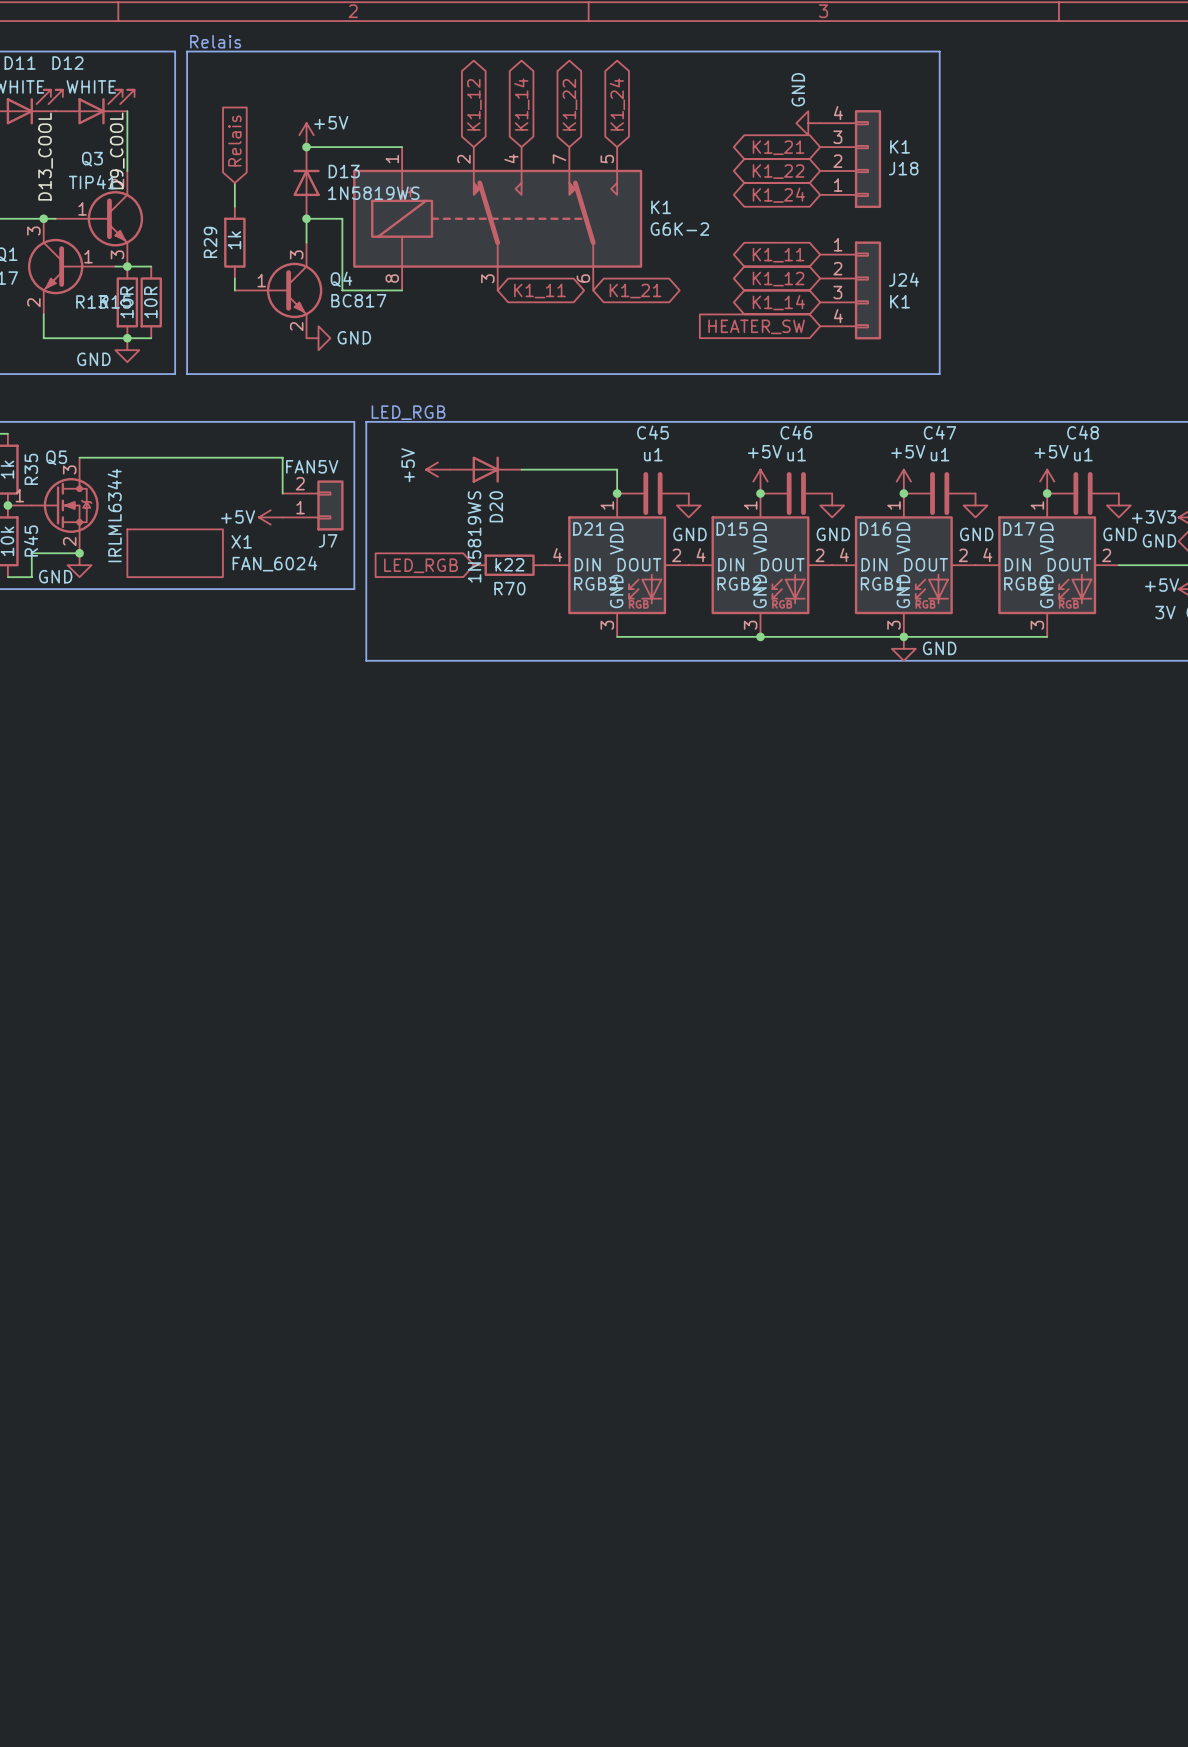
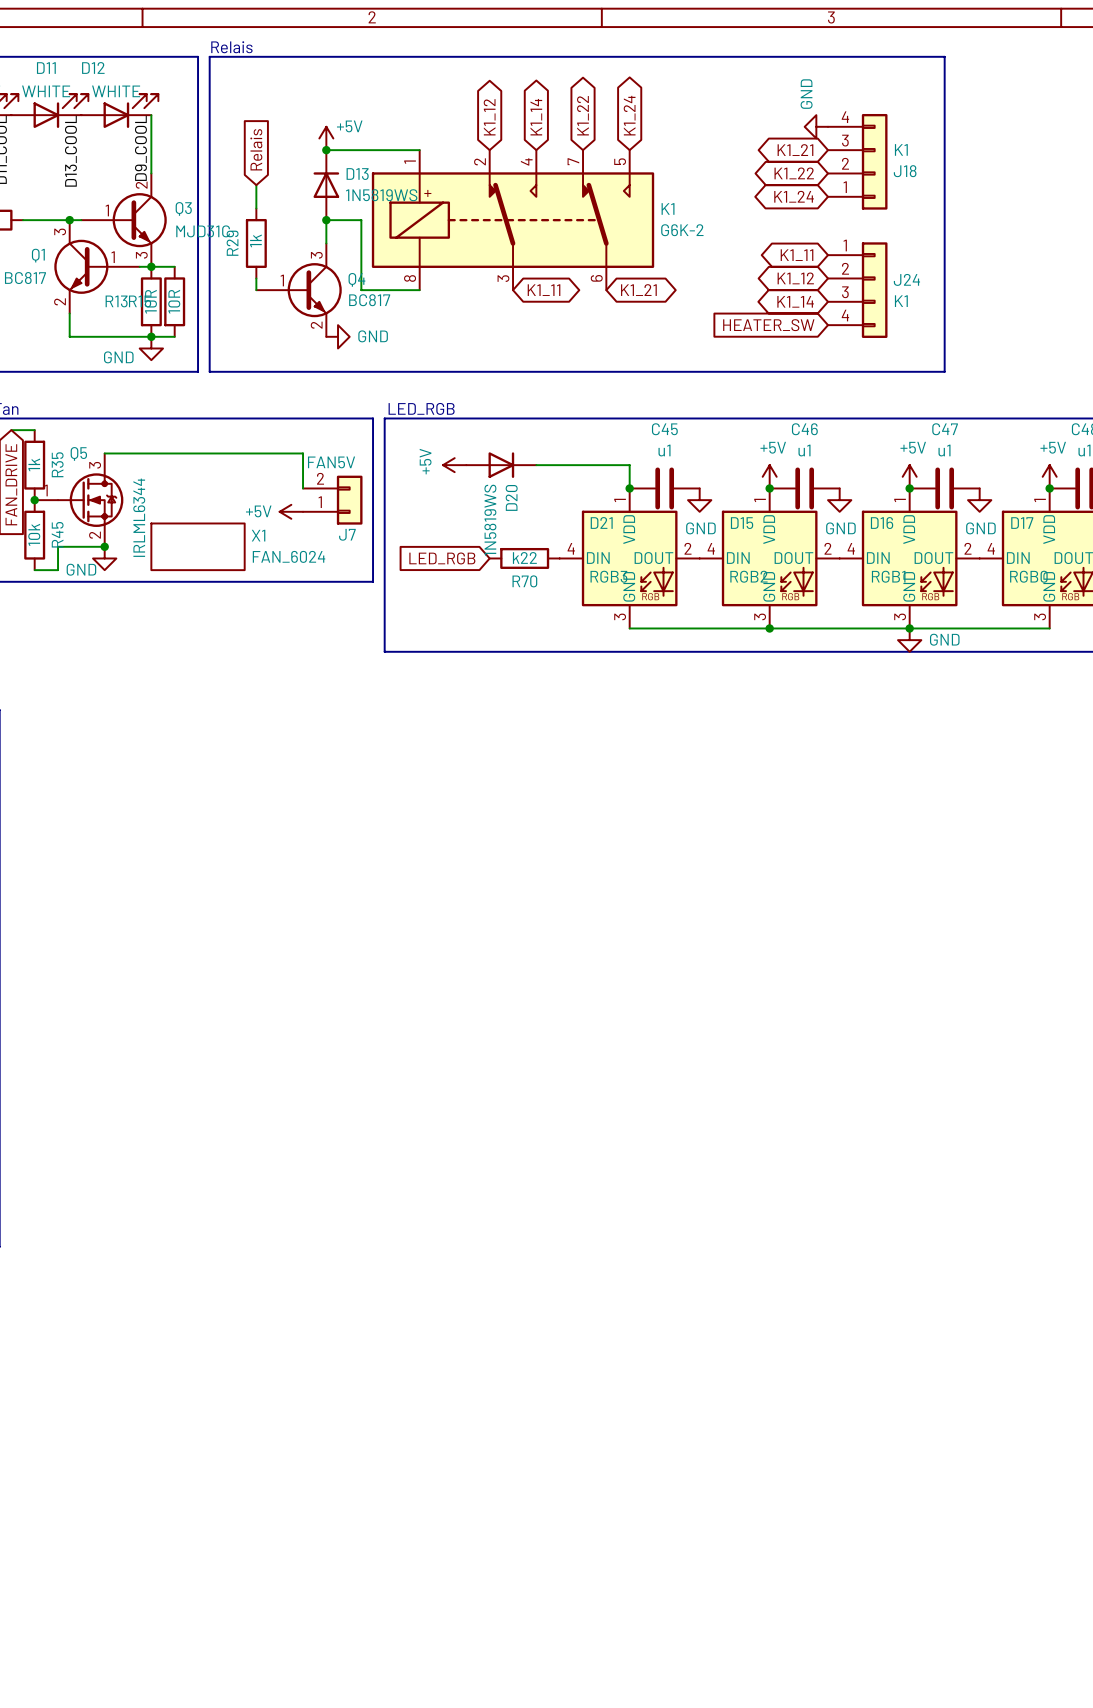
Q3 name position: Q3 (92, 159) -> Q3 (183, 208)
Q3 value: TIP41 (92, 182) -> MJD31C (203, 231)

